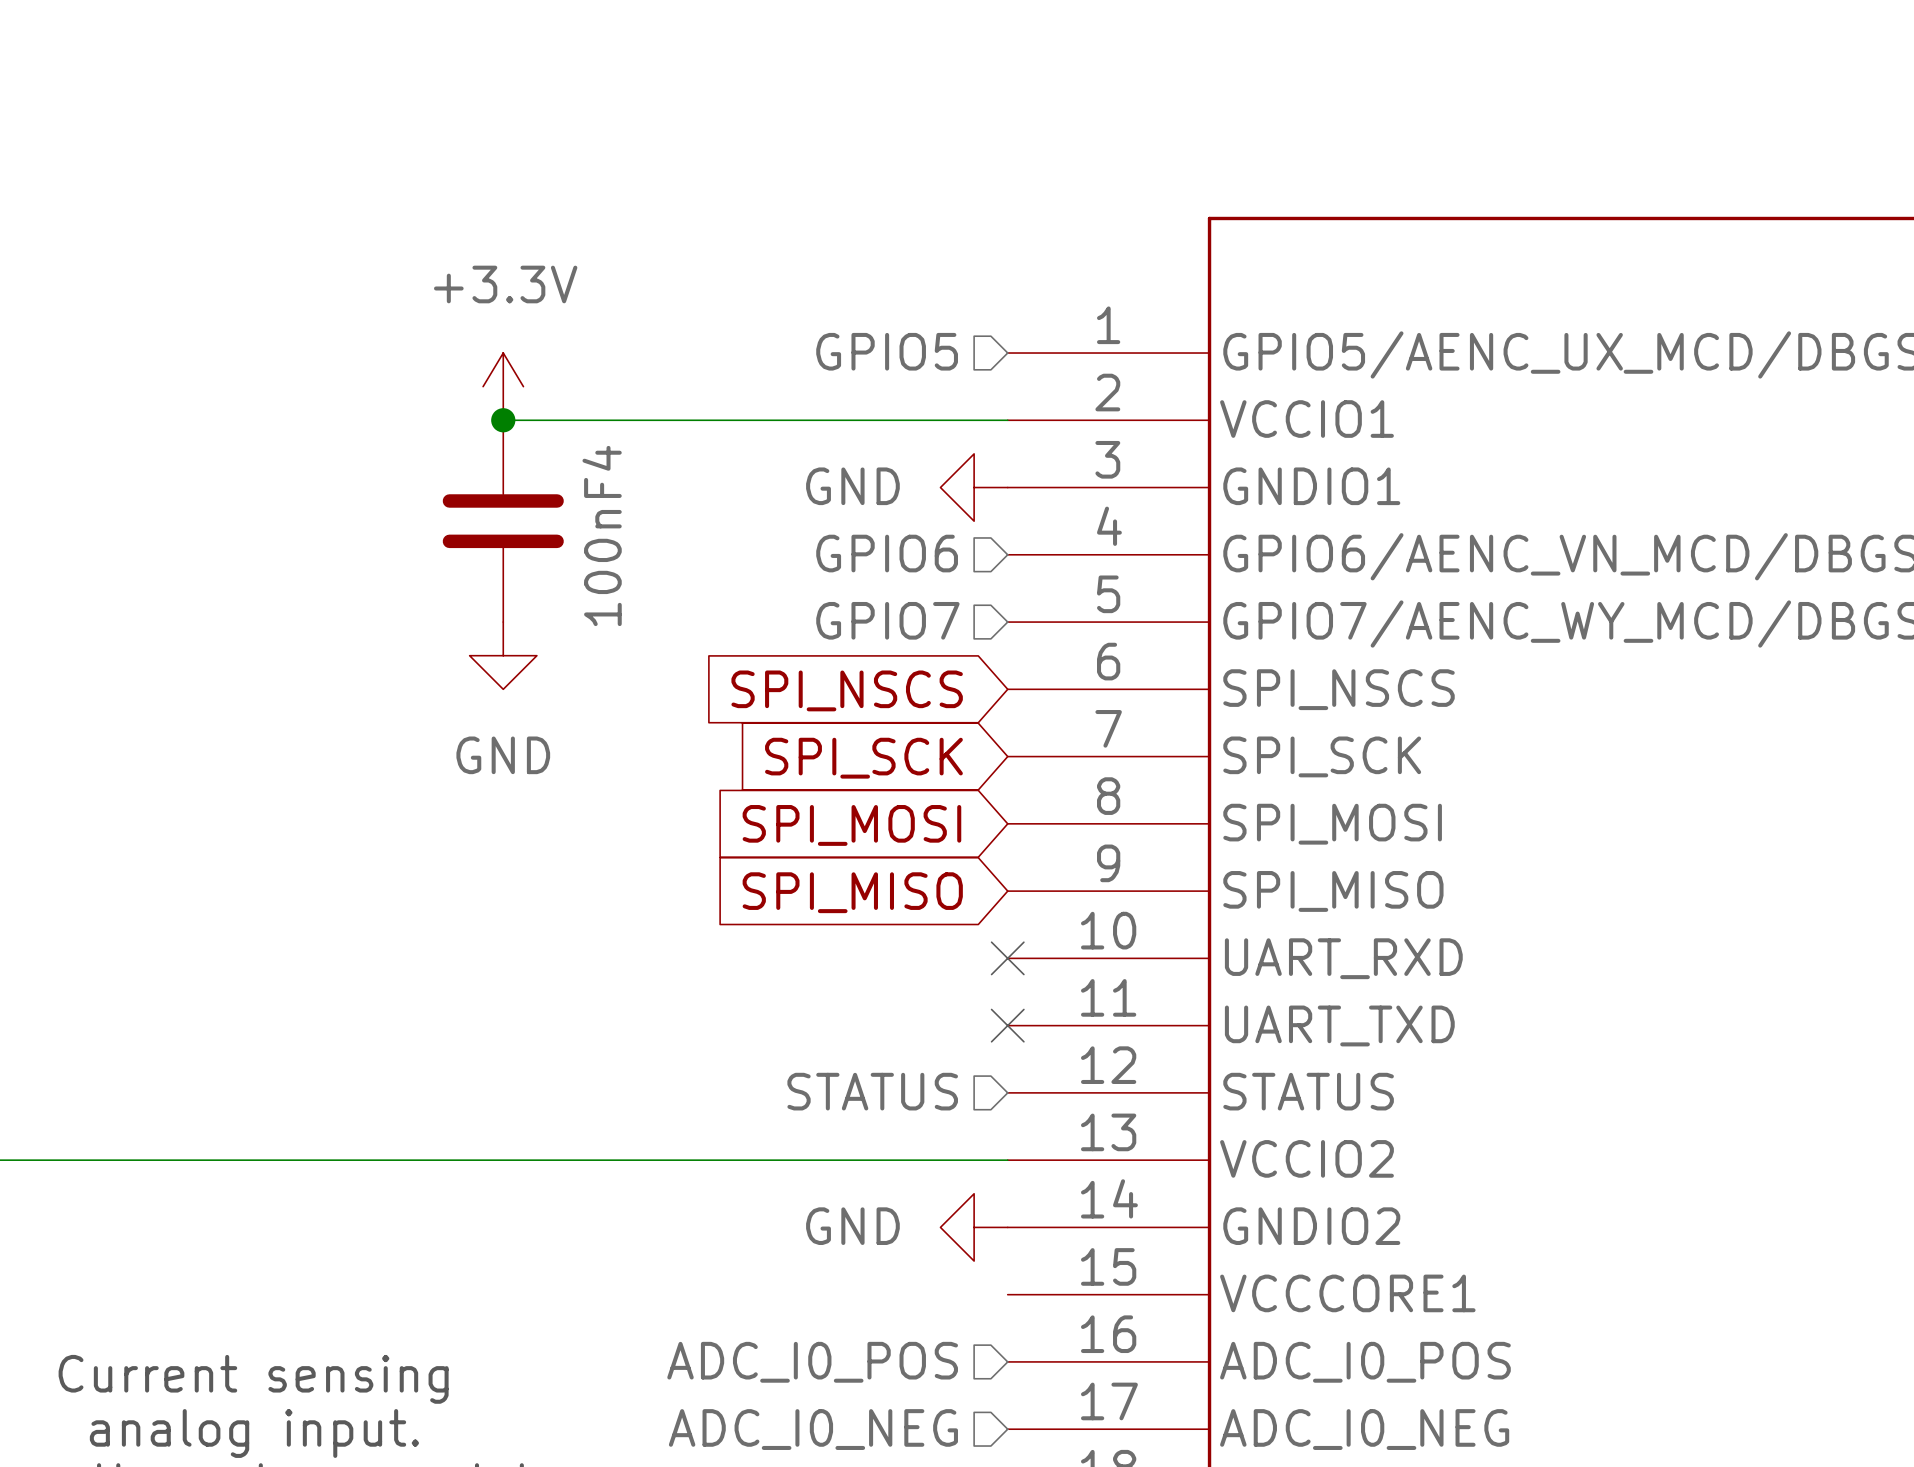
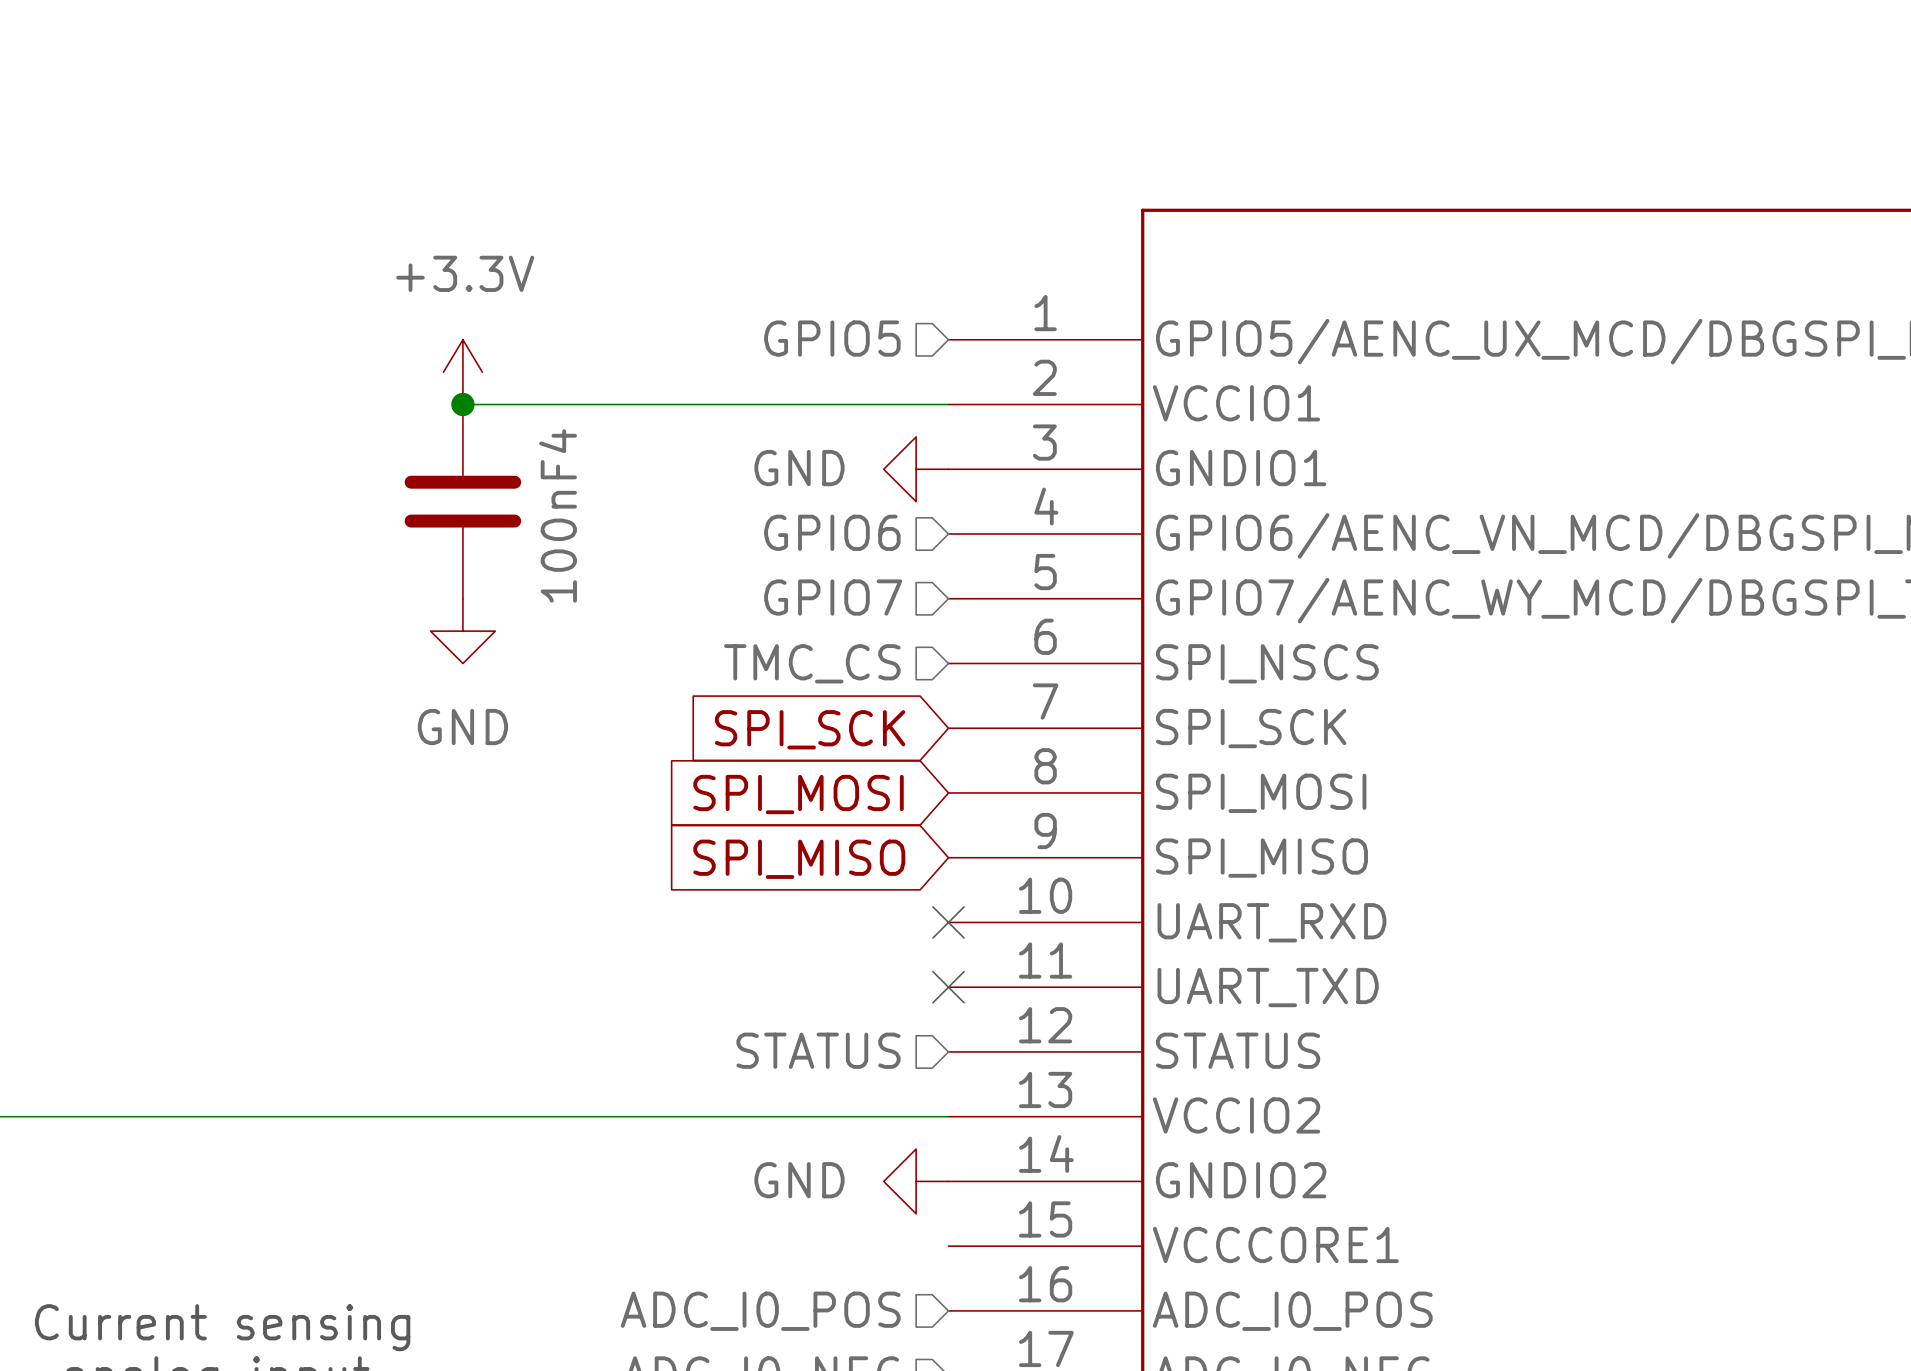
hierarchical label: none -> TMC_CS (812, 663)
global label: SPI_NSCS (847, 690) -> none

